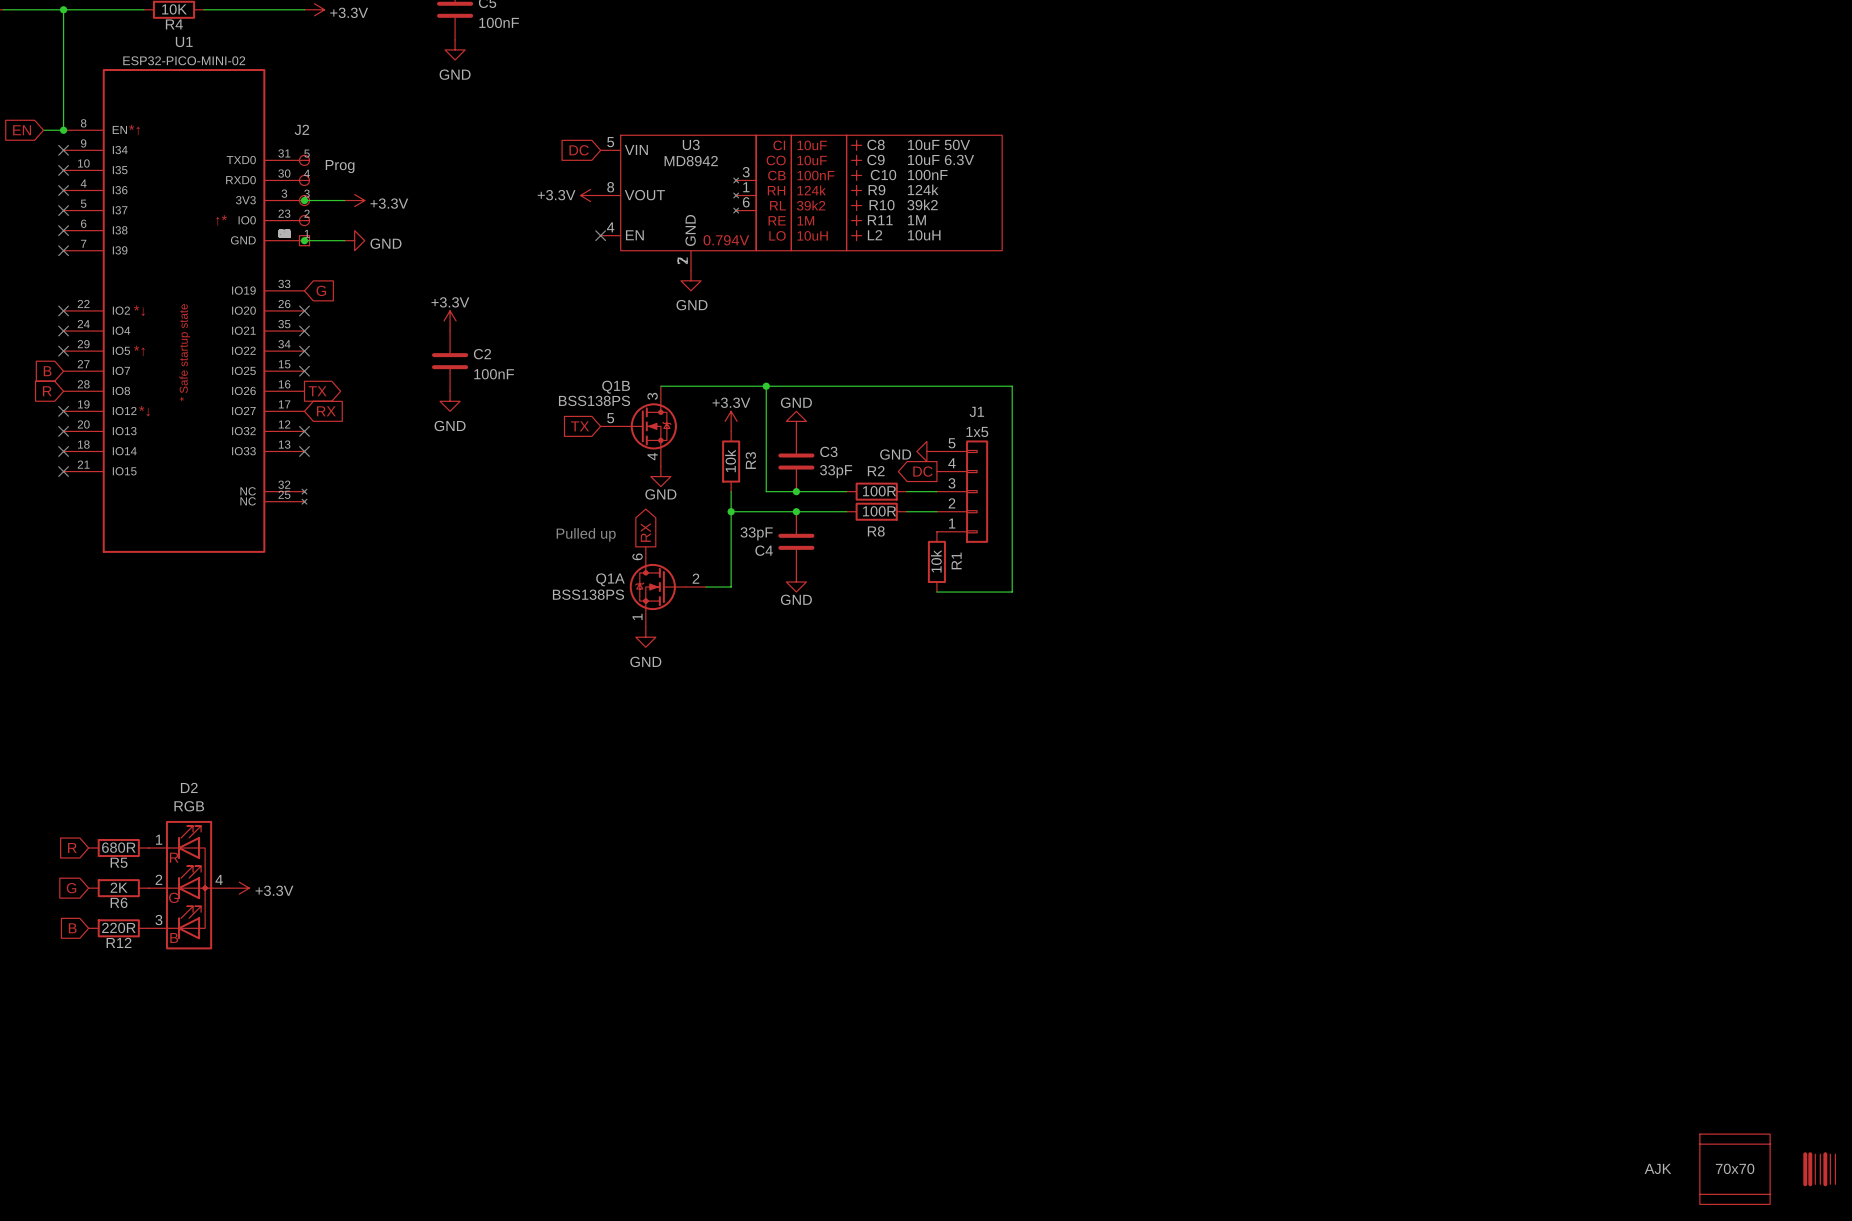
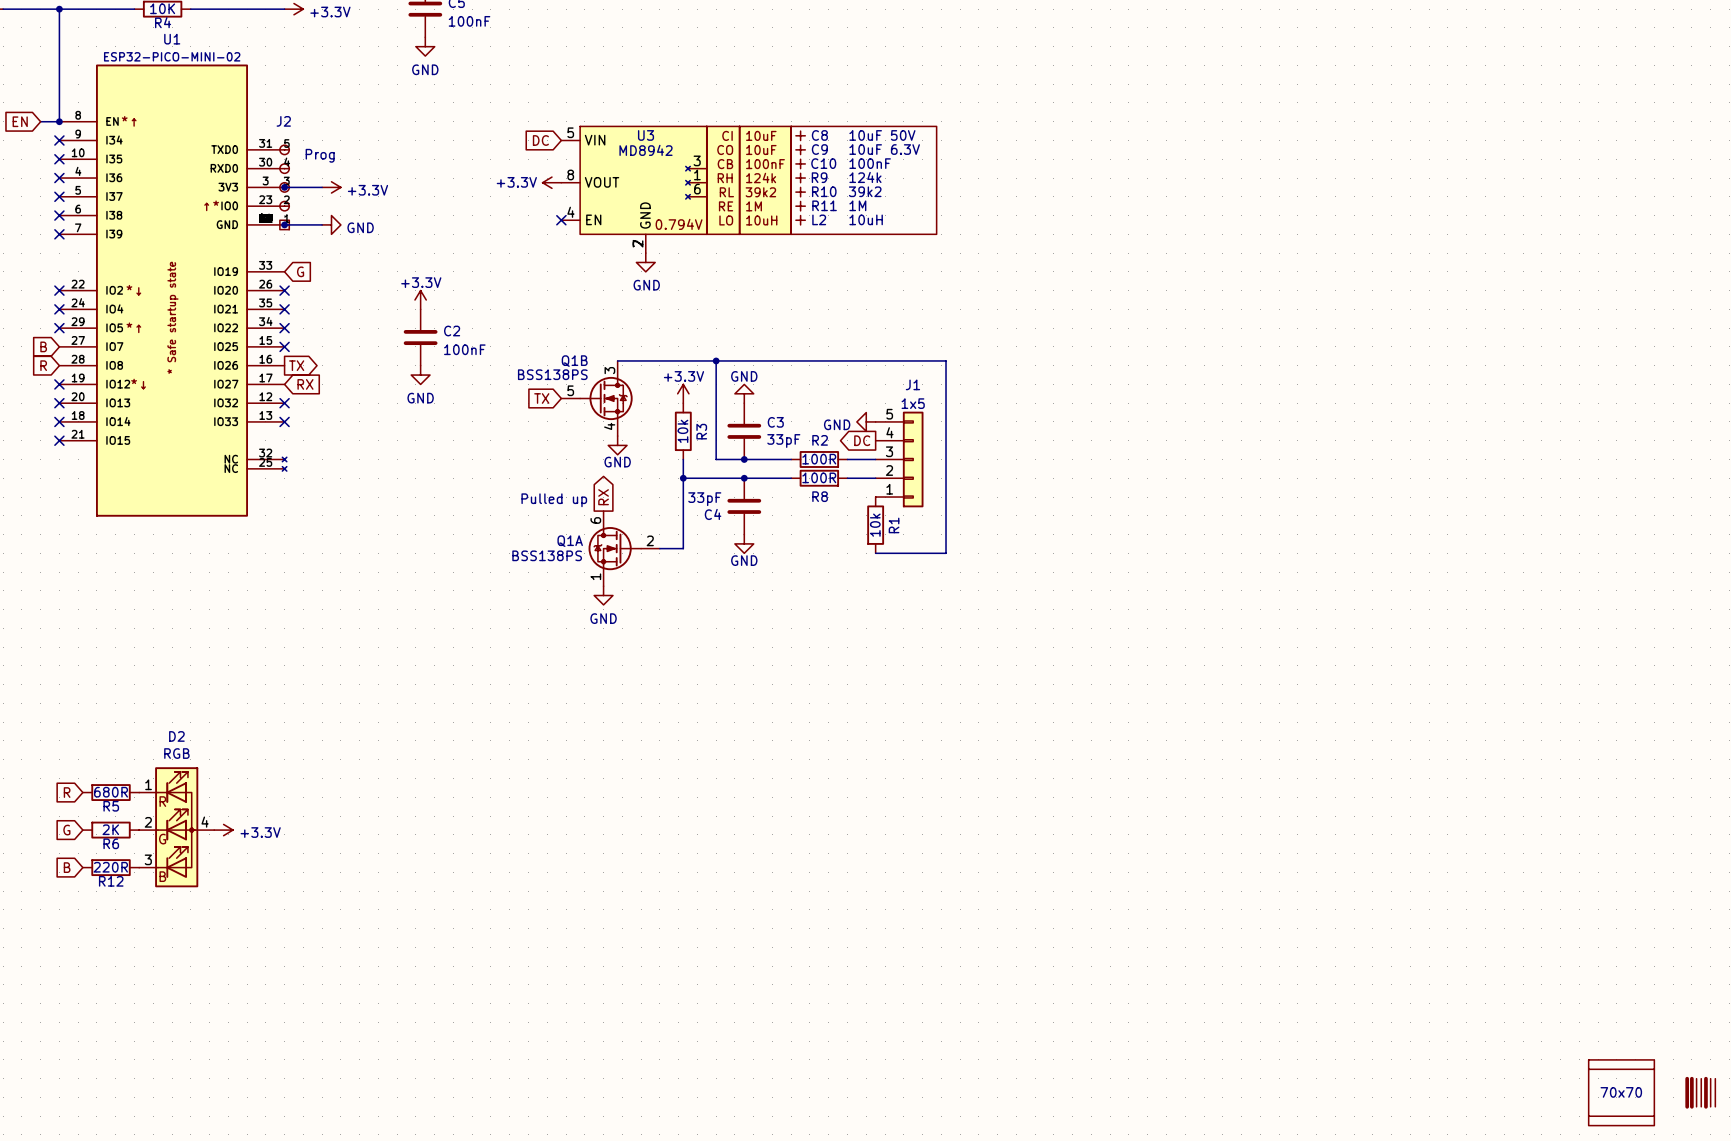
part: AJK (1657, 1168) -> none

